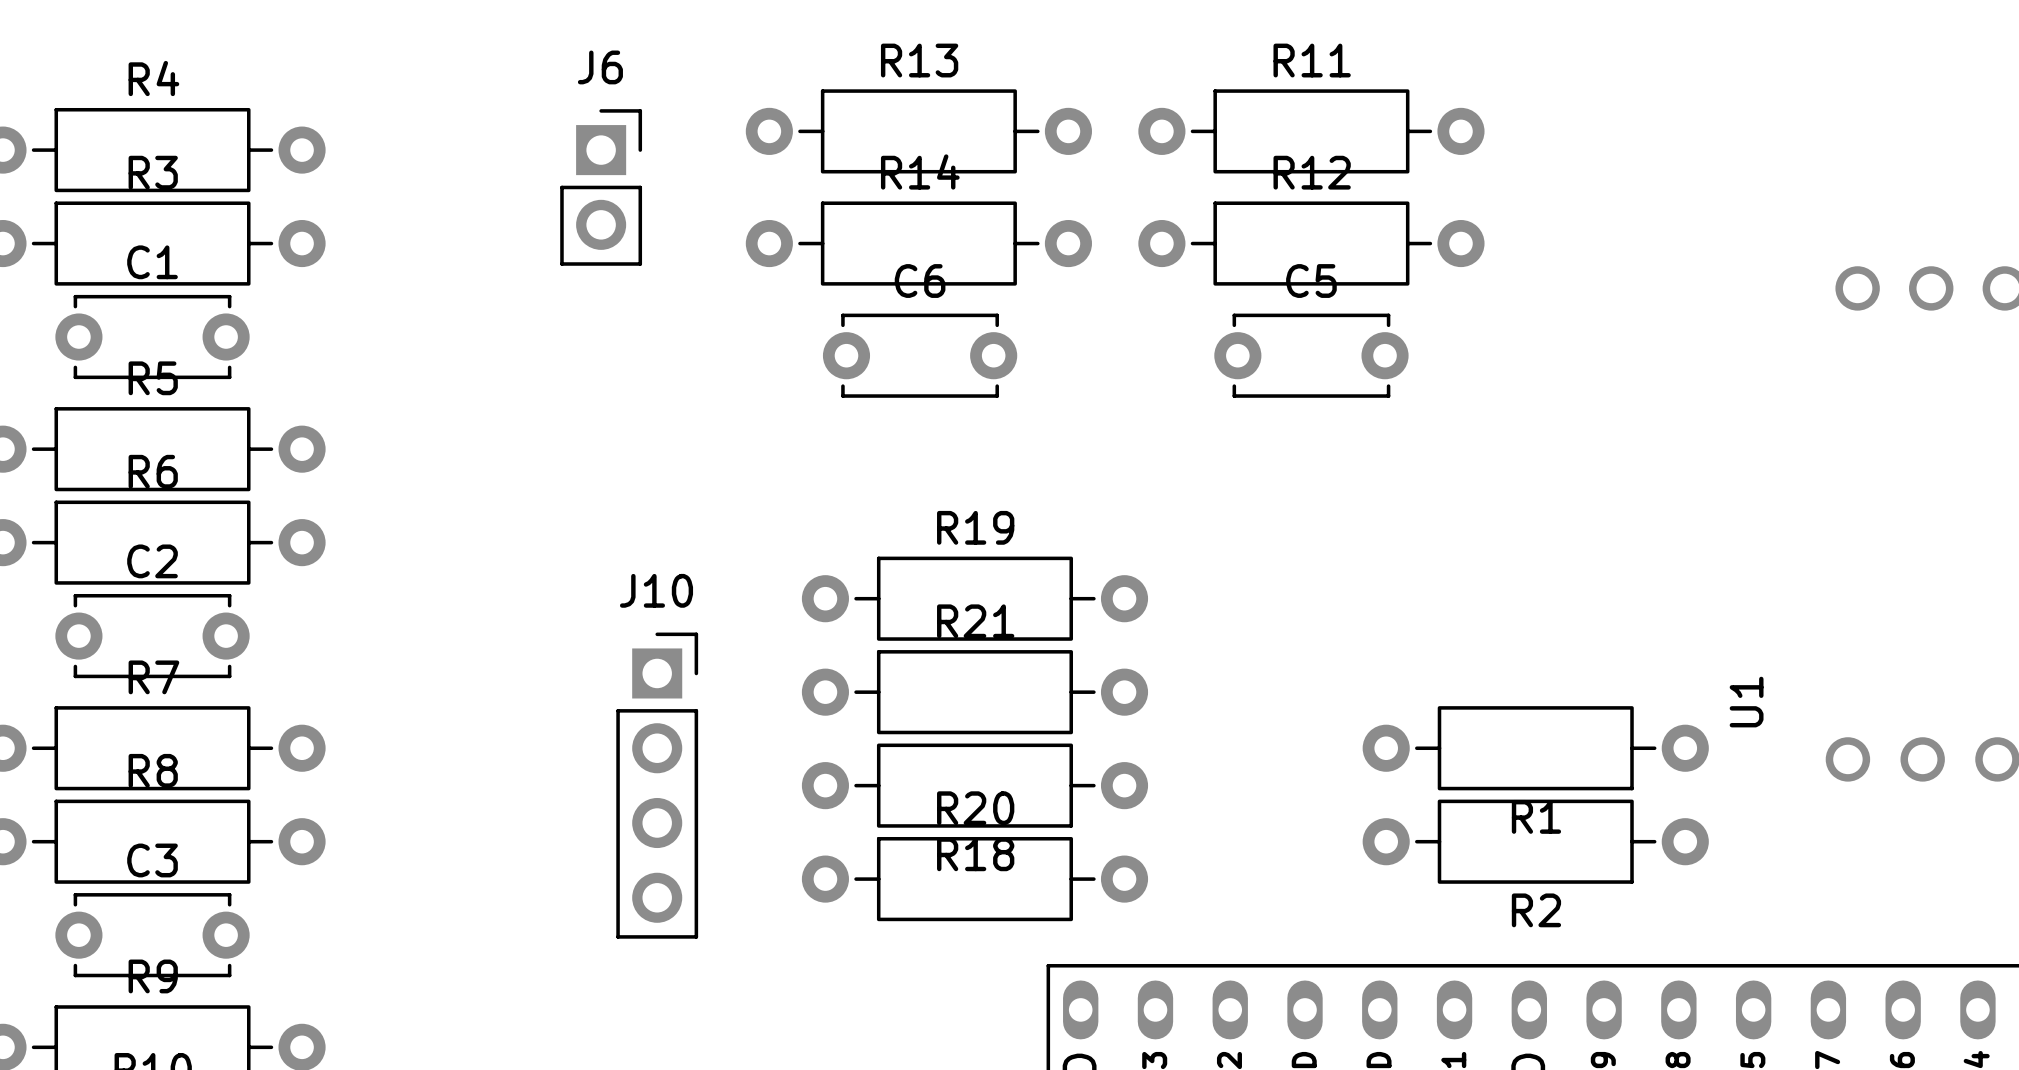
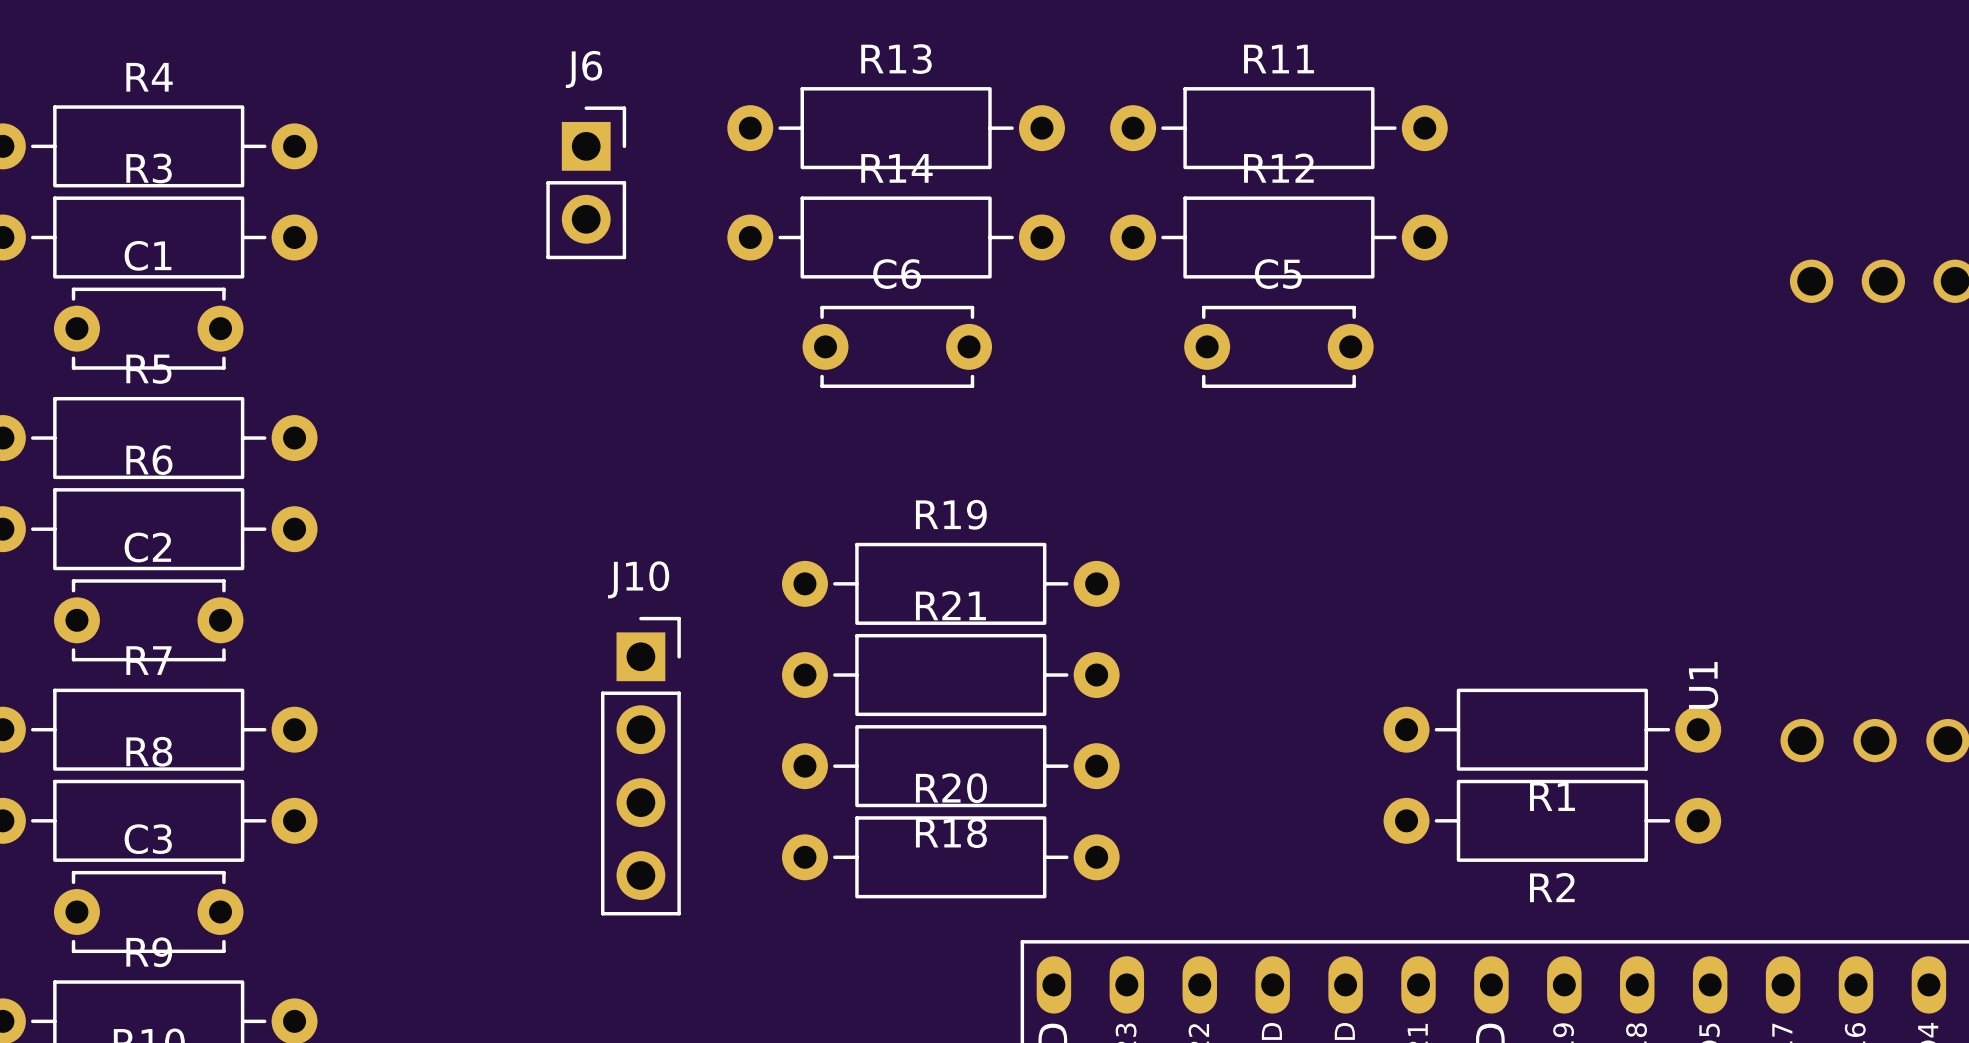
R1 position: (1535, 748) -> (1552, 729)
R2 position: (1535, 841) -> (1552, 820)

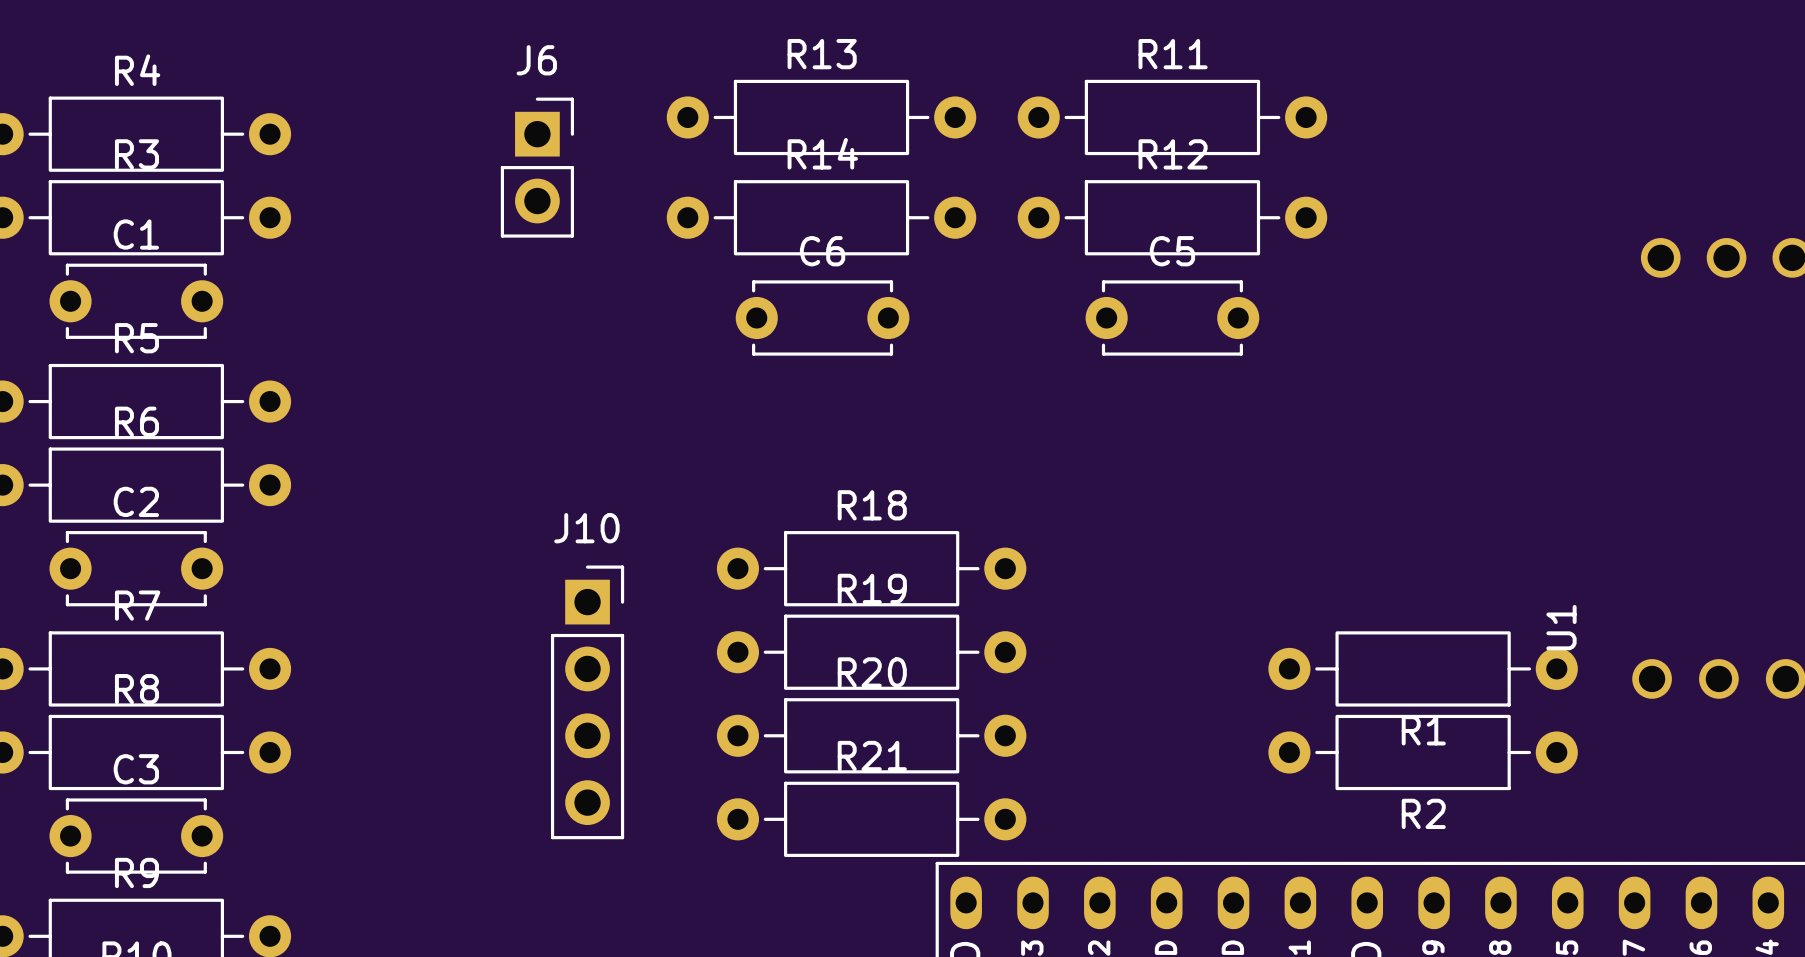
R19 position: (950, 583) -> (871, 652)
R21 position: (950, 675) -> (871, 819)
R18 position: (950, 766) -> (871, 568)
R18 name position: R18 (951, 833) -> R18 (872, 505)
R20 position: (950, 857) -> (871, 735)

